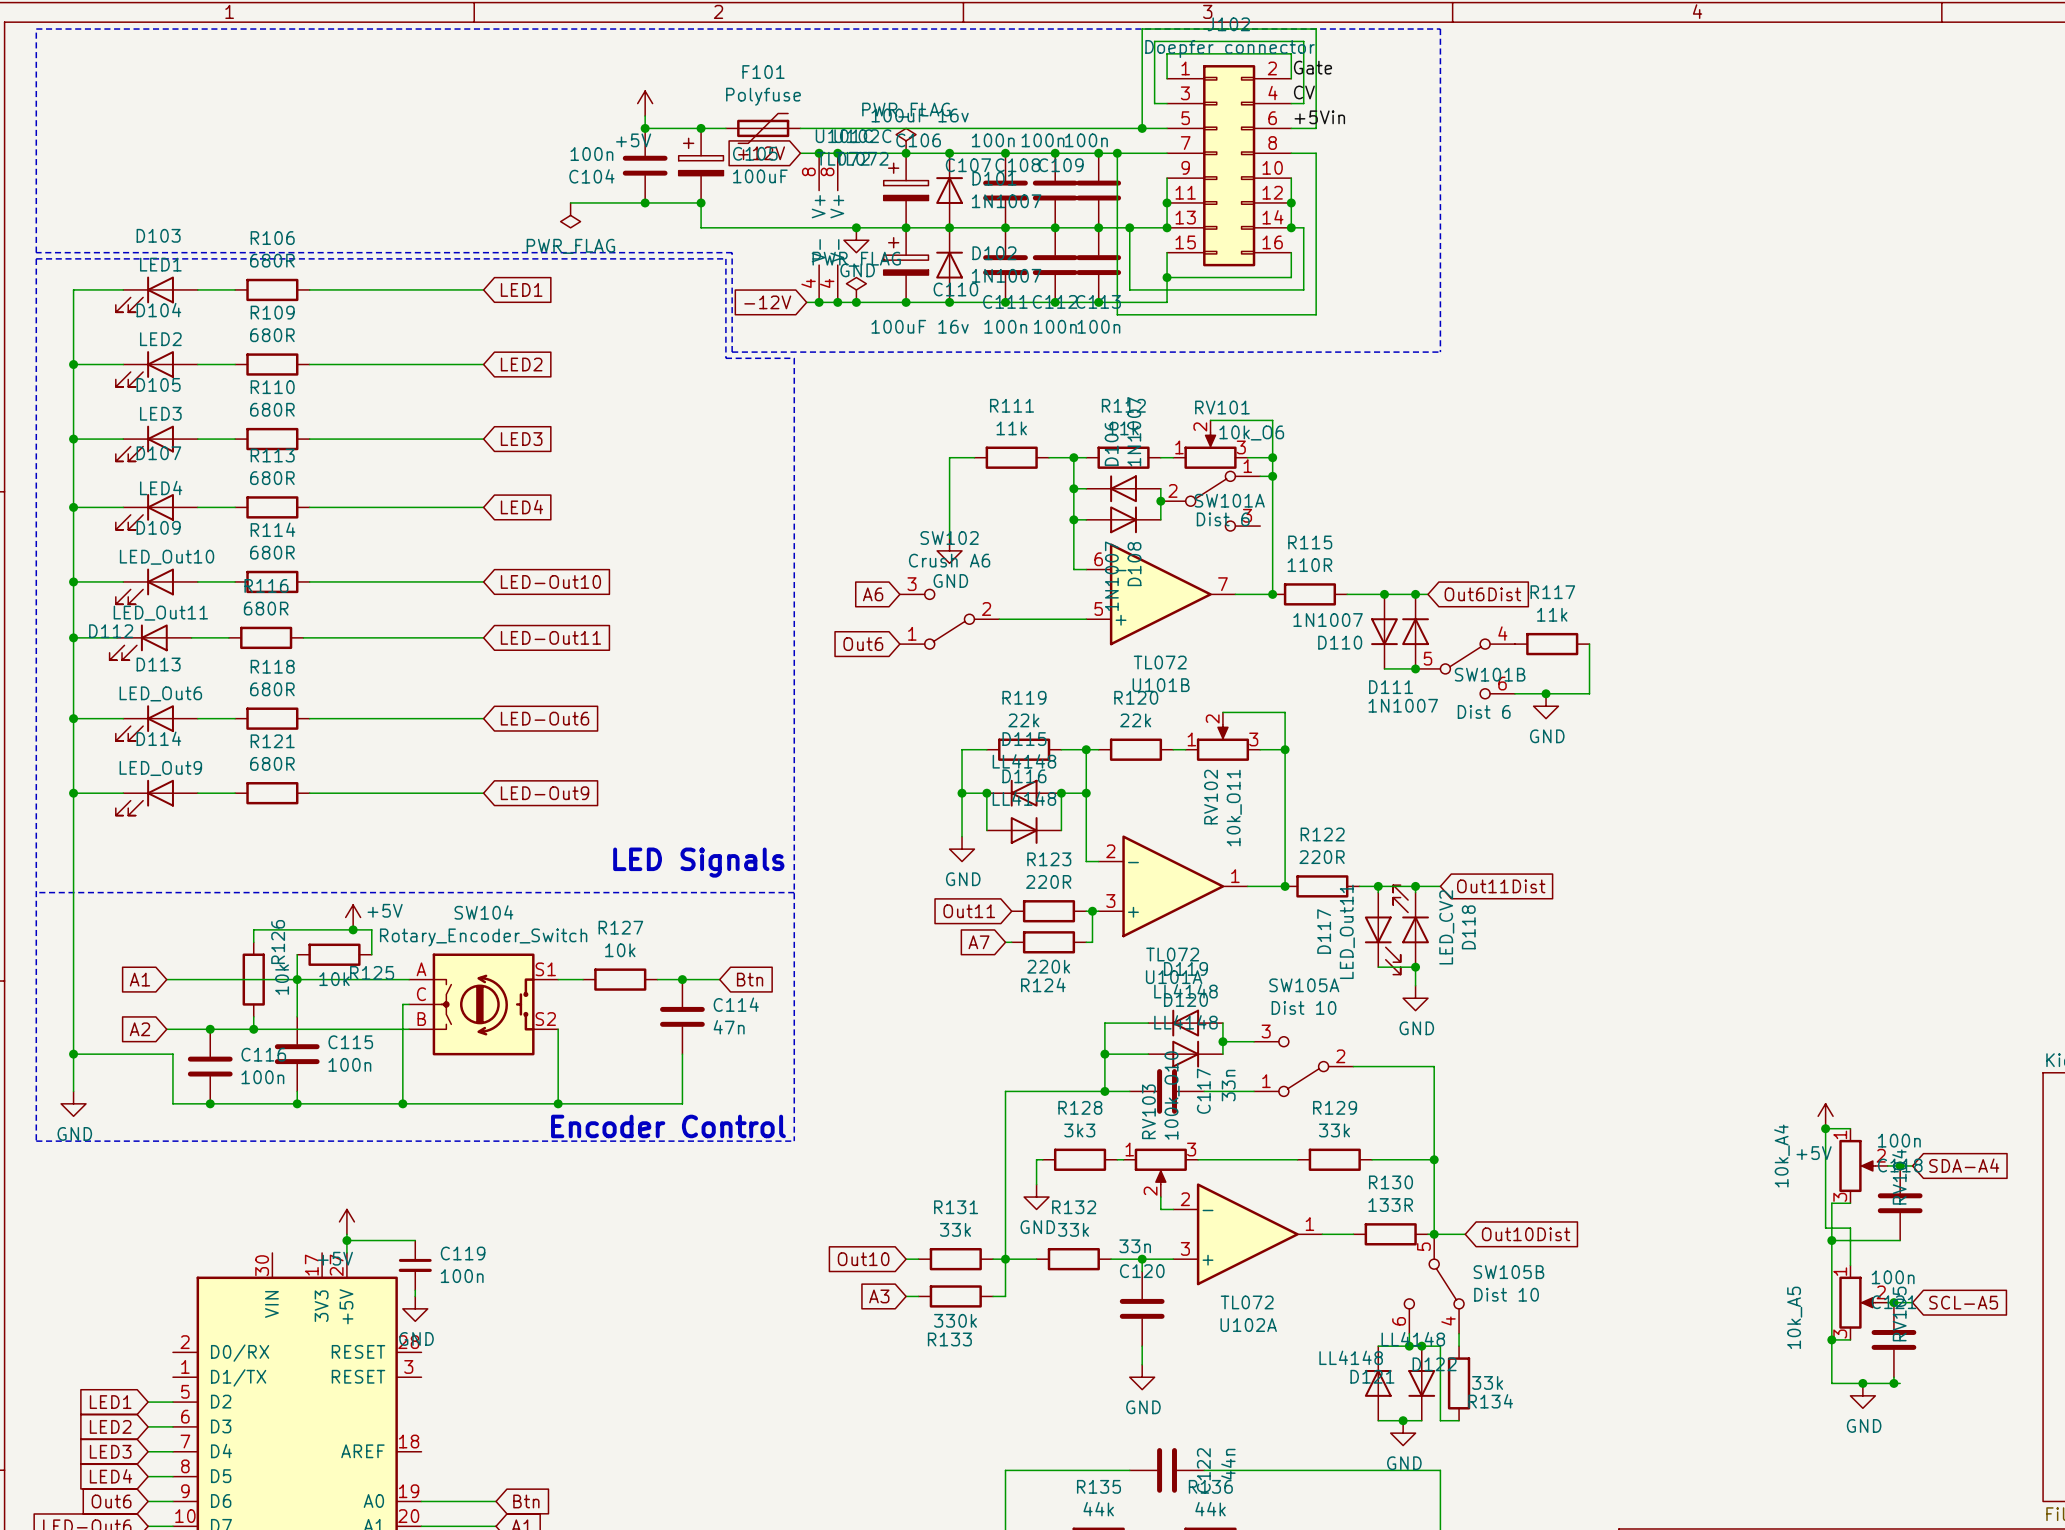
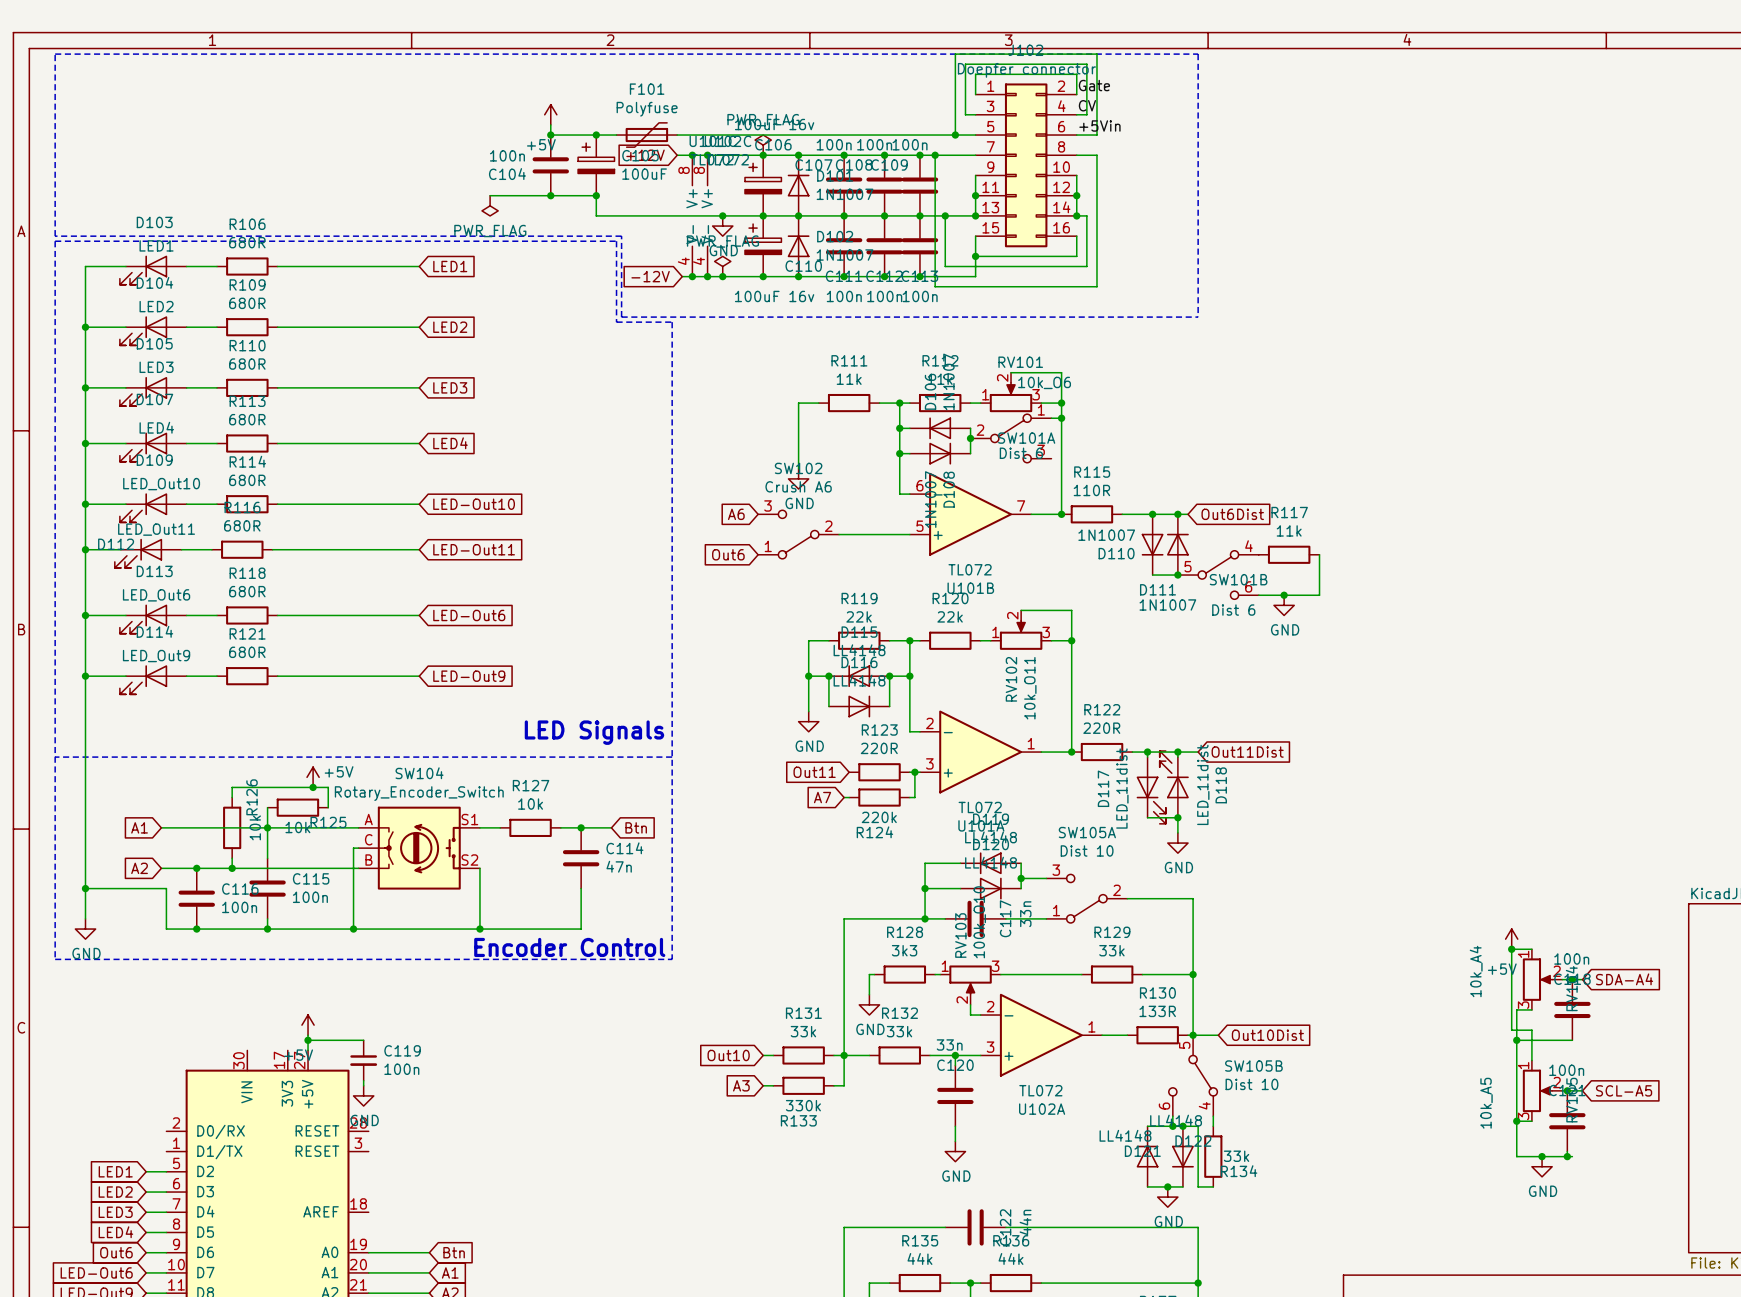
D118 value: LED_CV2 (1446, 927) -> LED_11dist (1203, 784)
D117 value: LED_Out11 (1347, 931) -> LED_11dist (1122, 788)

